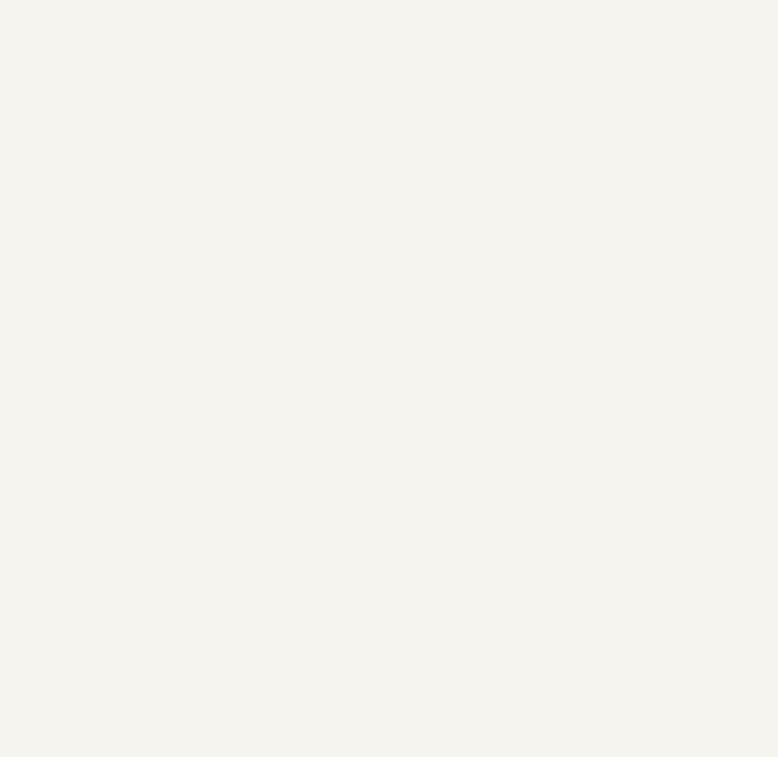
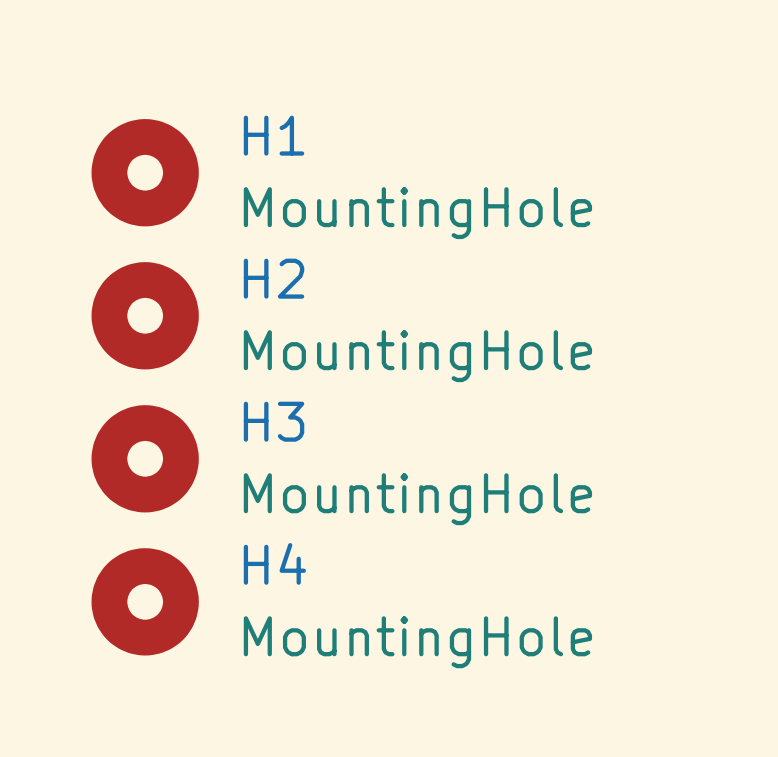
H1: none -> MountingHole (145, 172)
H2: none -> MountingHole (145, 315)
H3: none -> MountingHole (145, 458)
H4: none -> MountingHole (145, 601)

